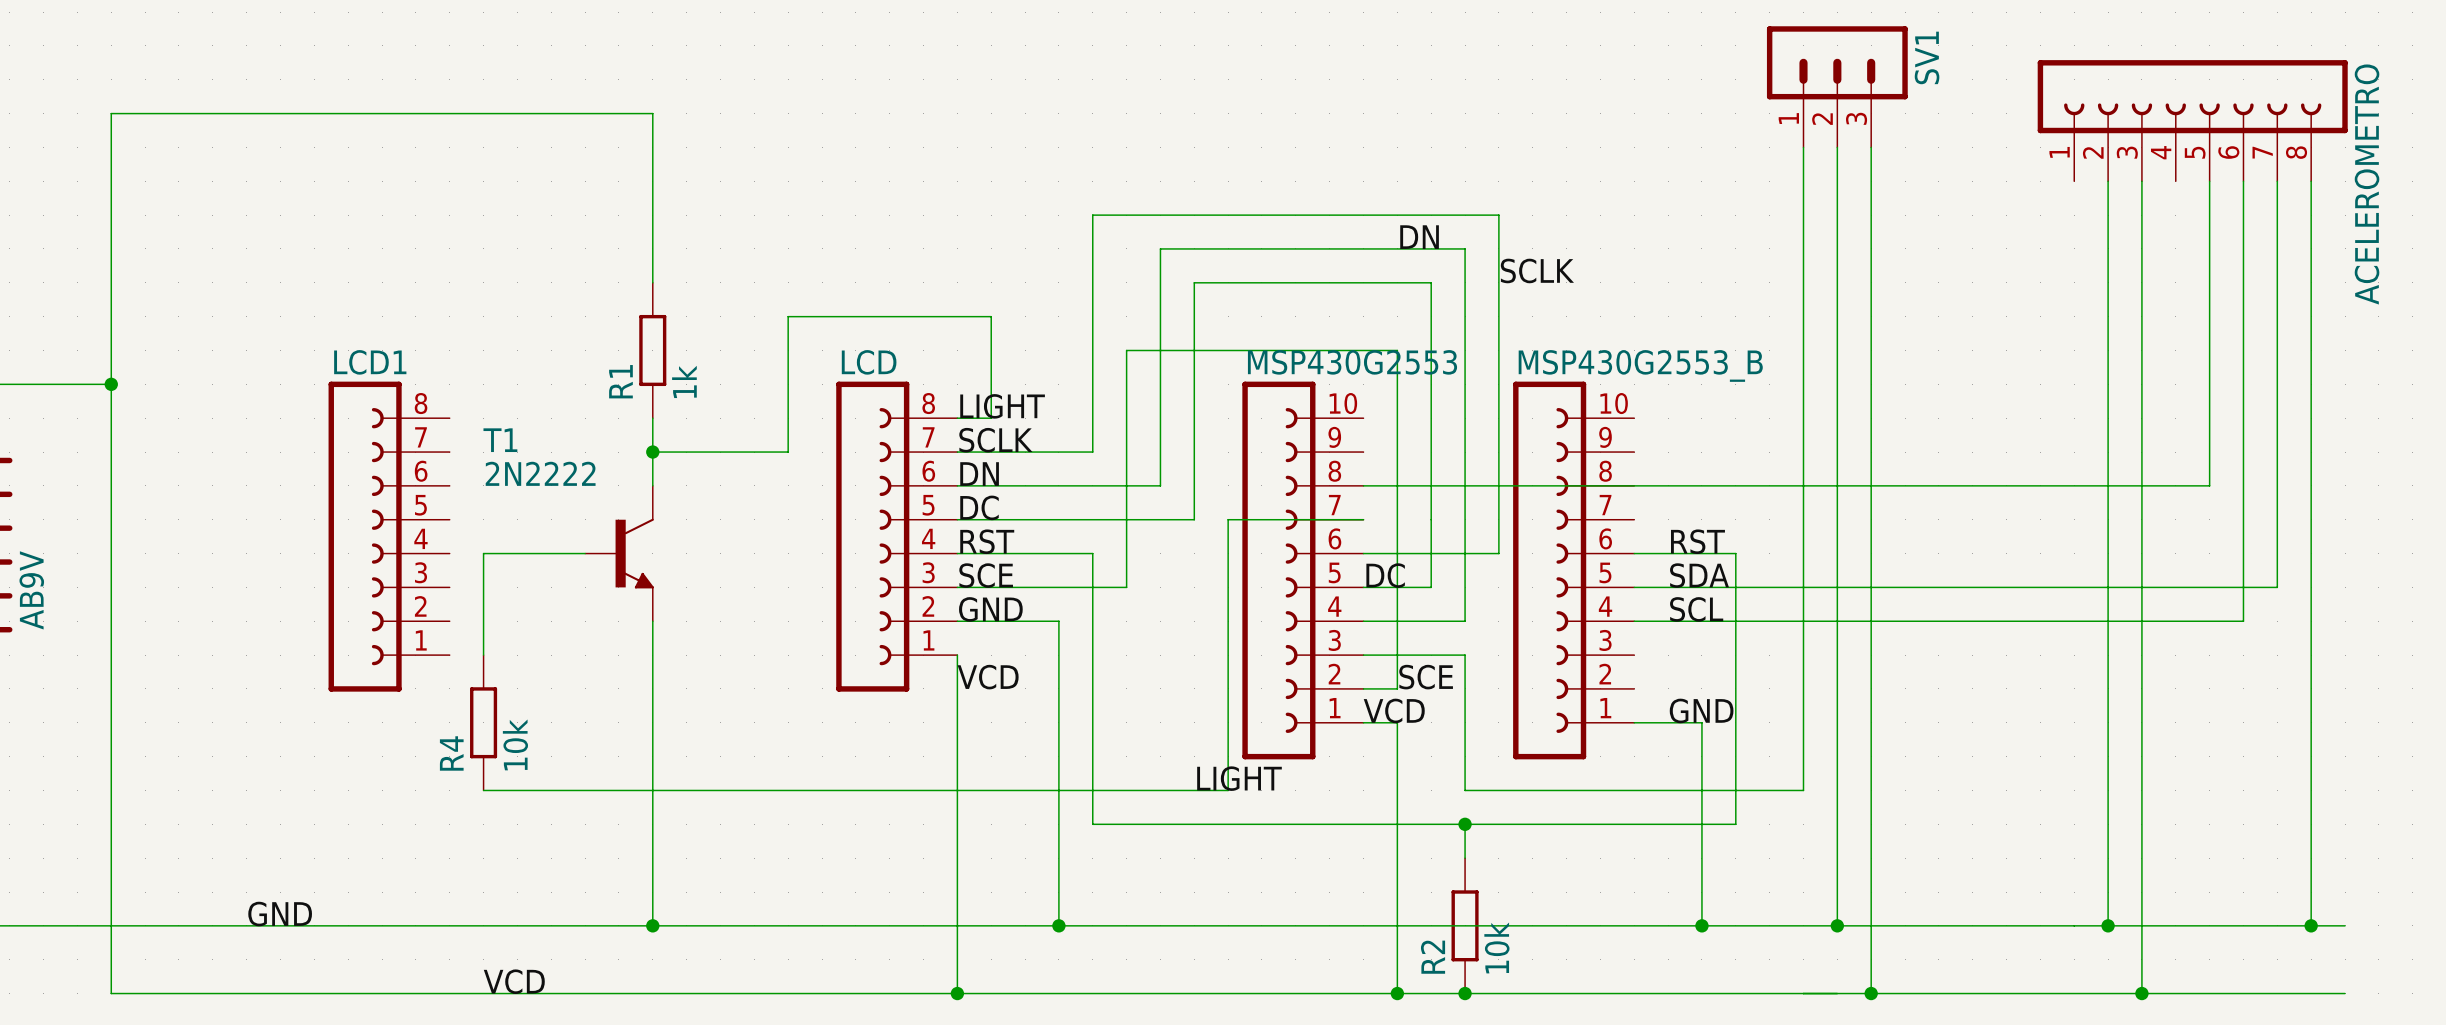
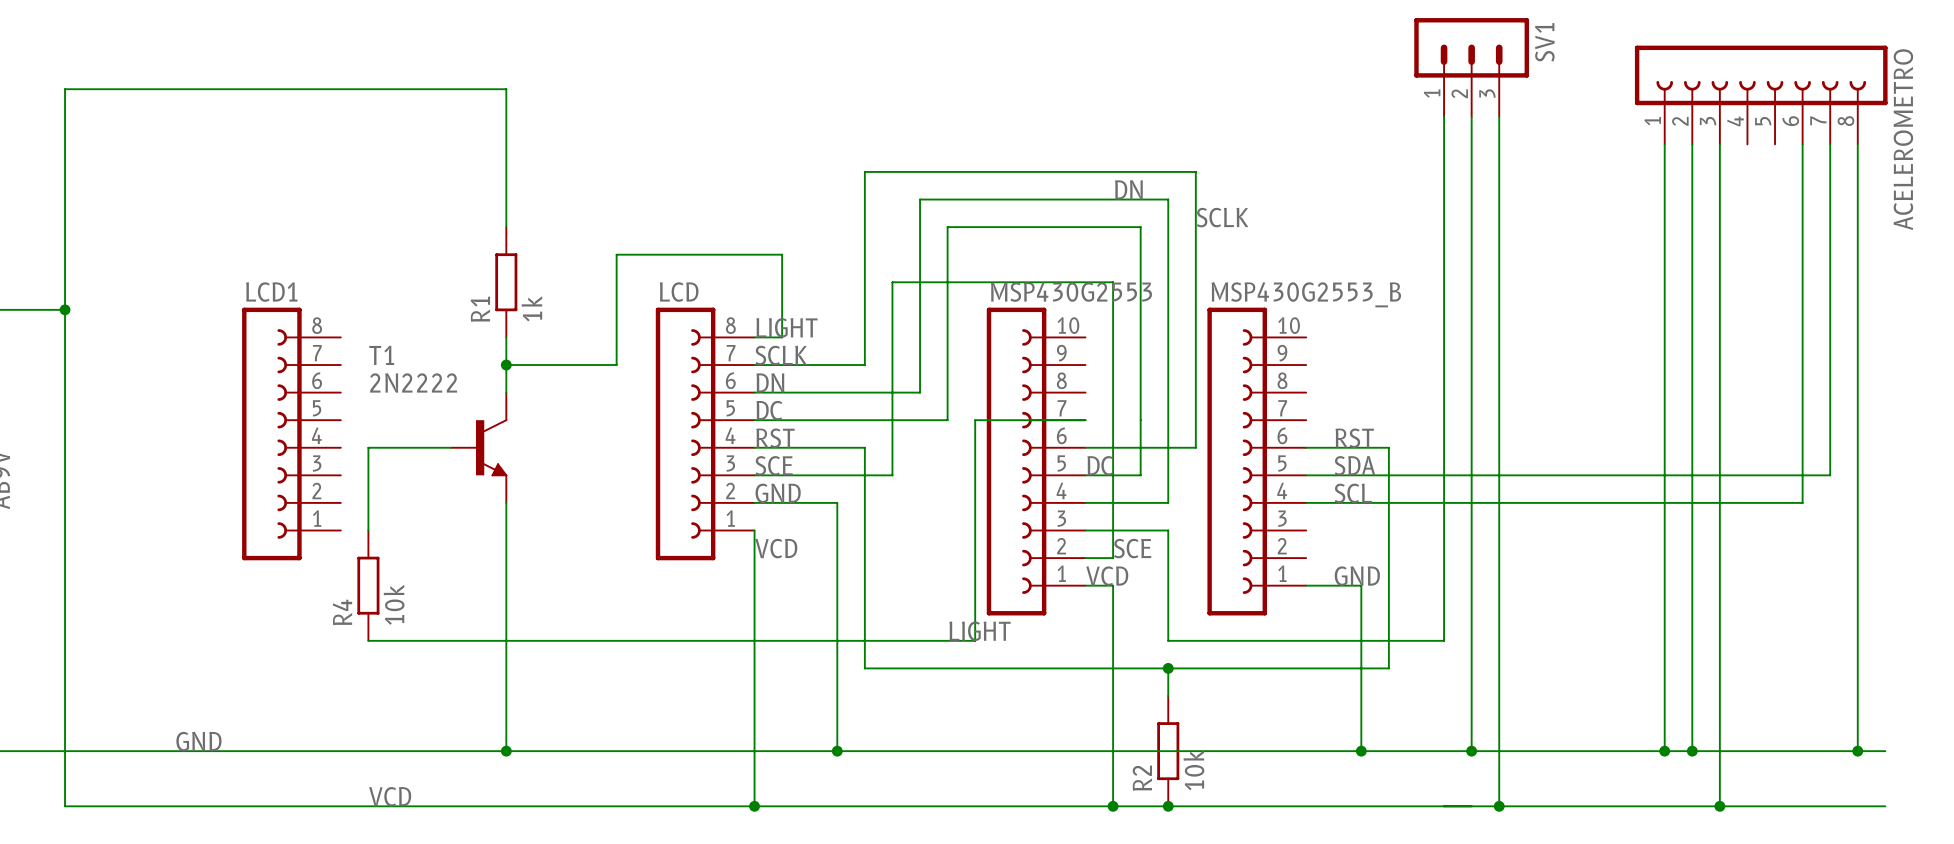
wire: none -> (1664, 144) (1664, 751)
wire: (2209, 181) (2209, 485) (1363, 485) -> none
junction: none -> (1664, 751)

